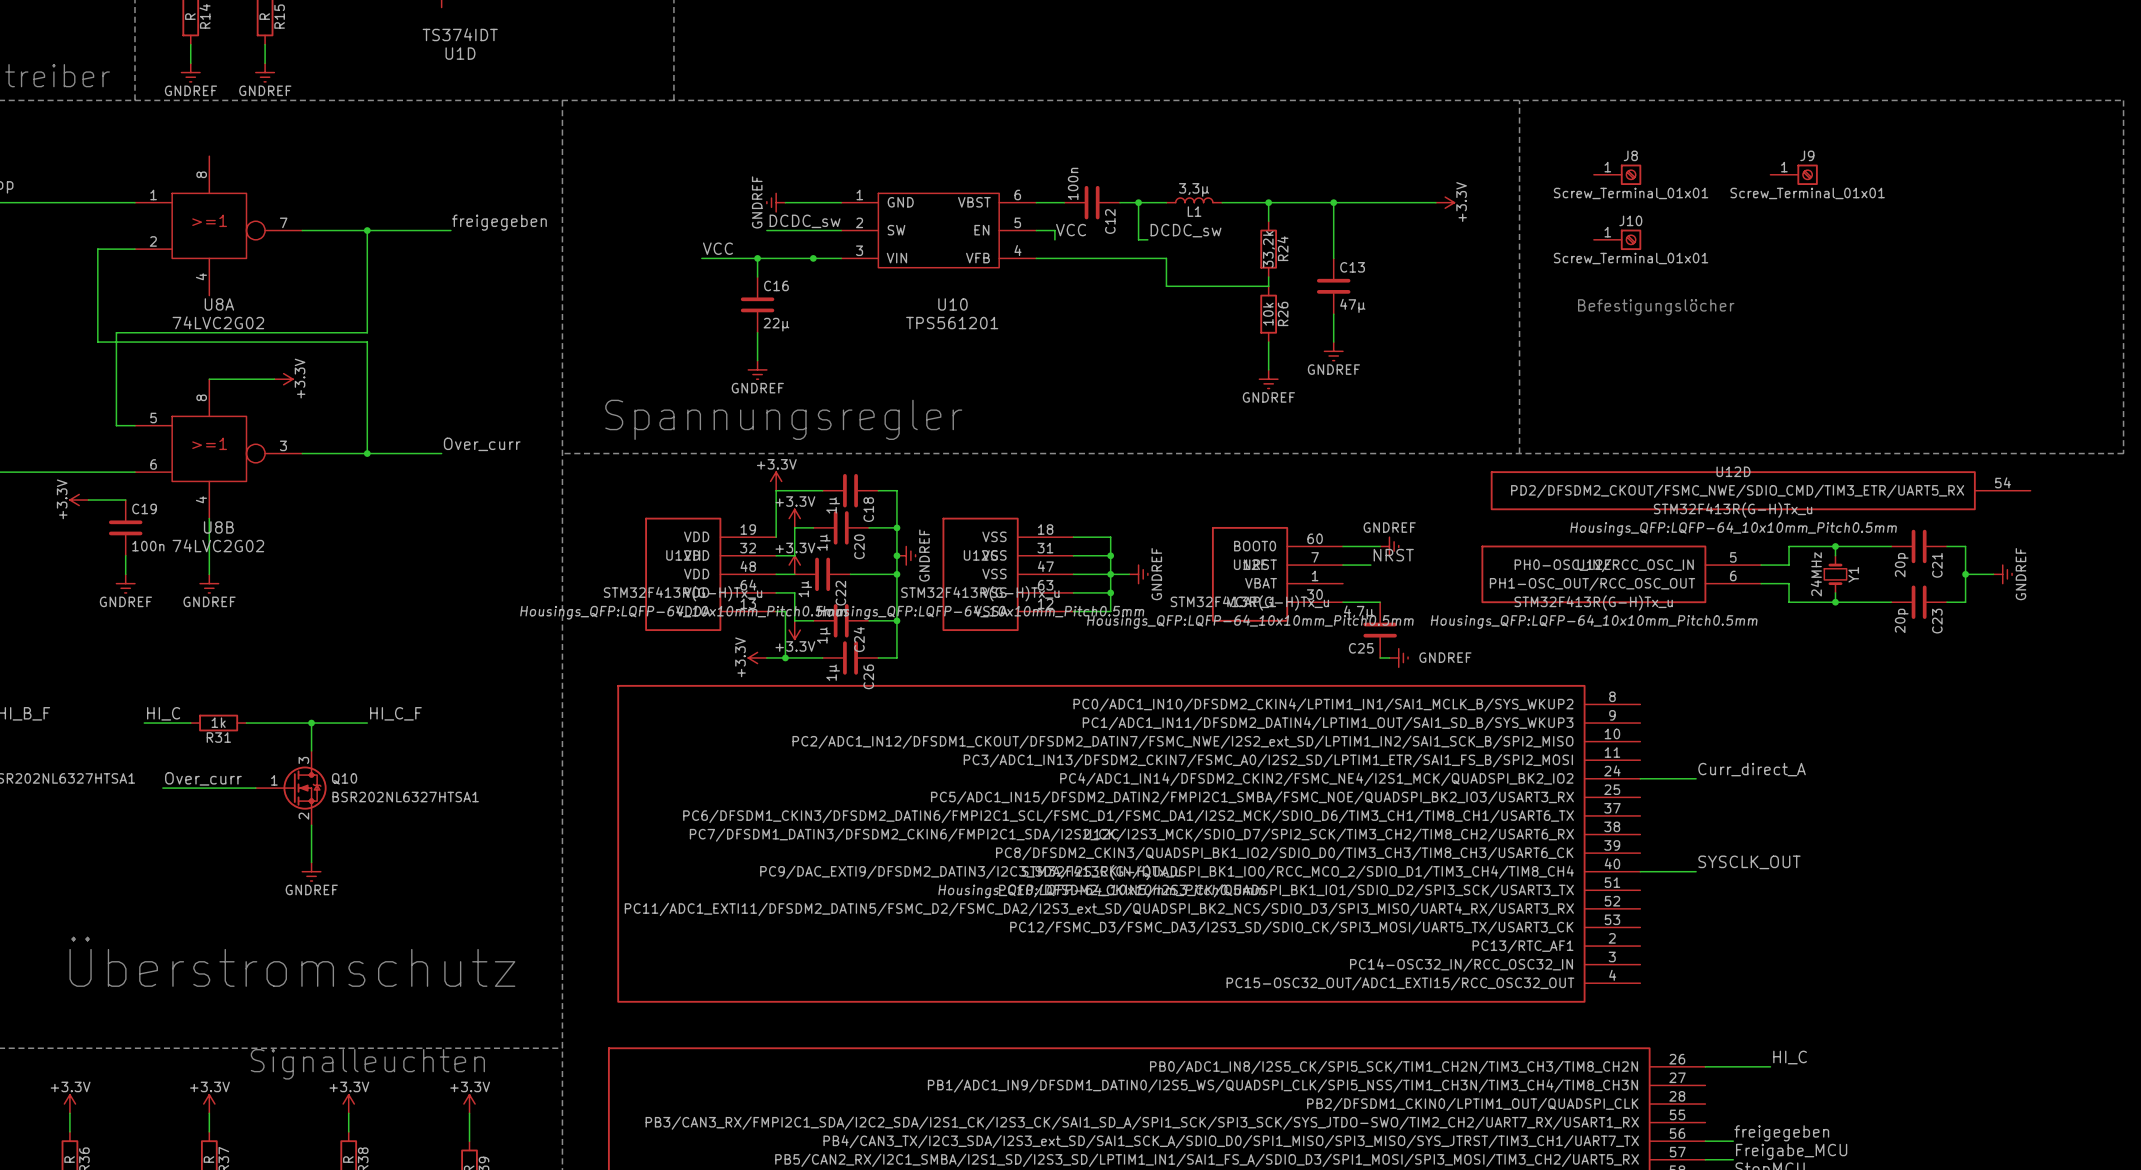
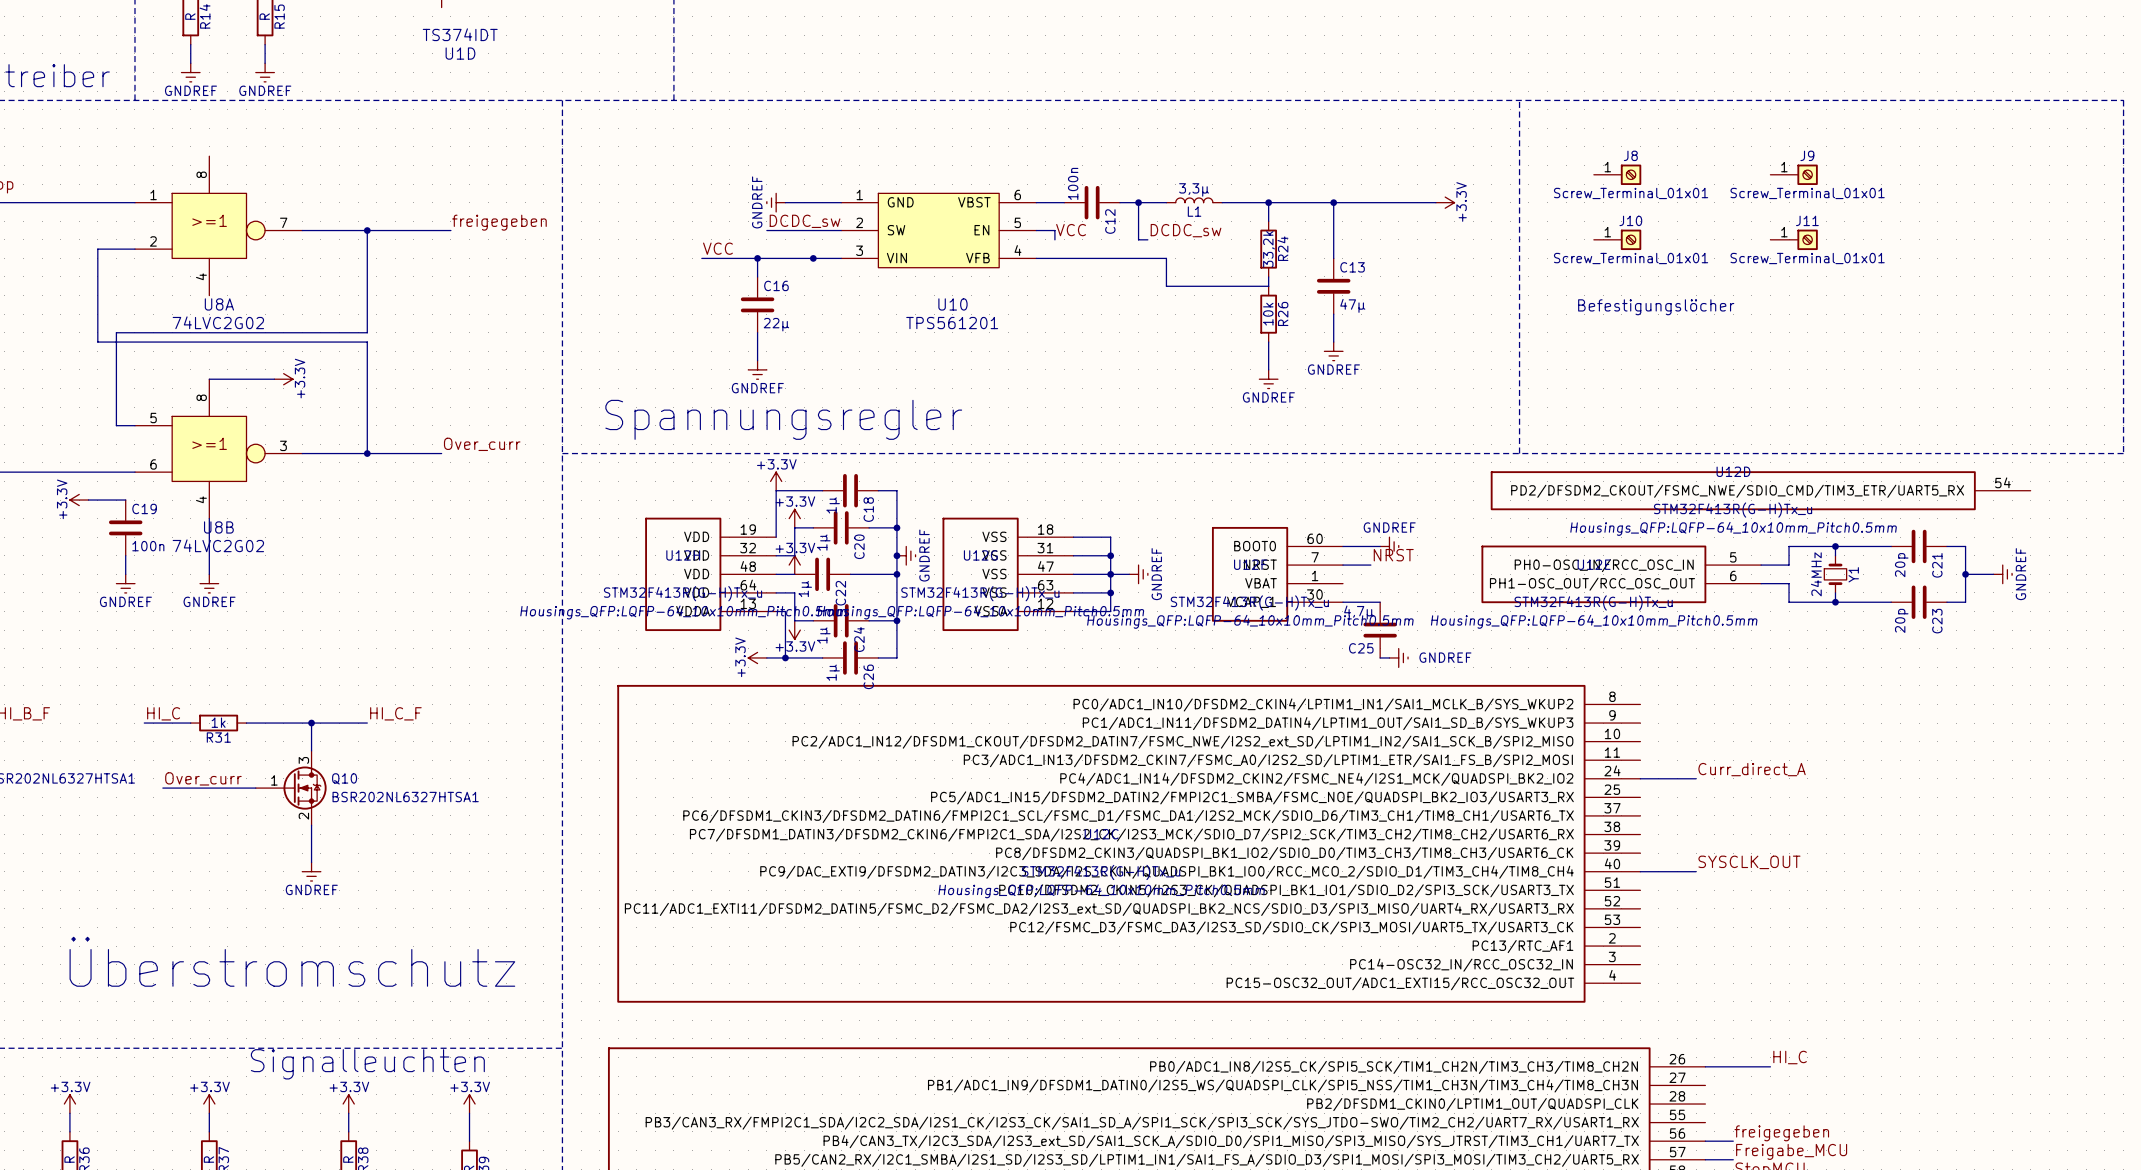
J11: none -> Screw_Terminal_01x01 (1794, 239)

